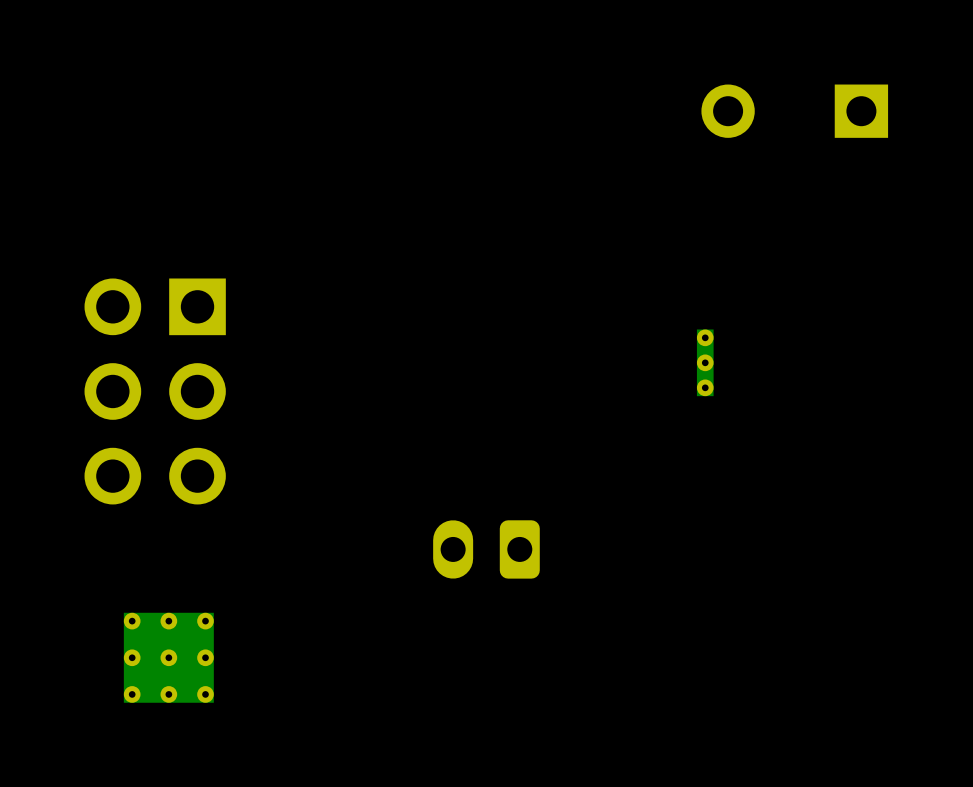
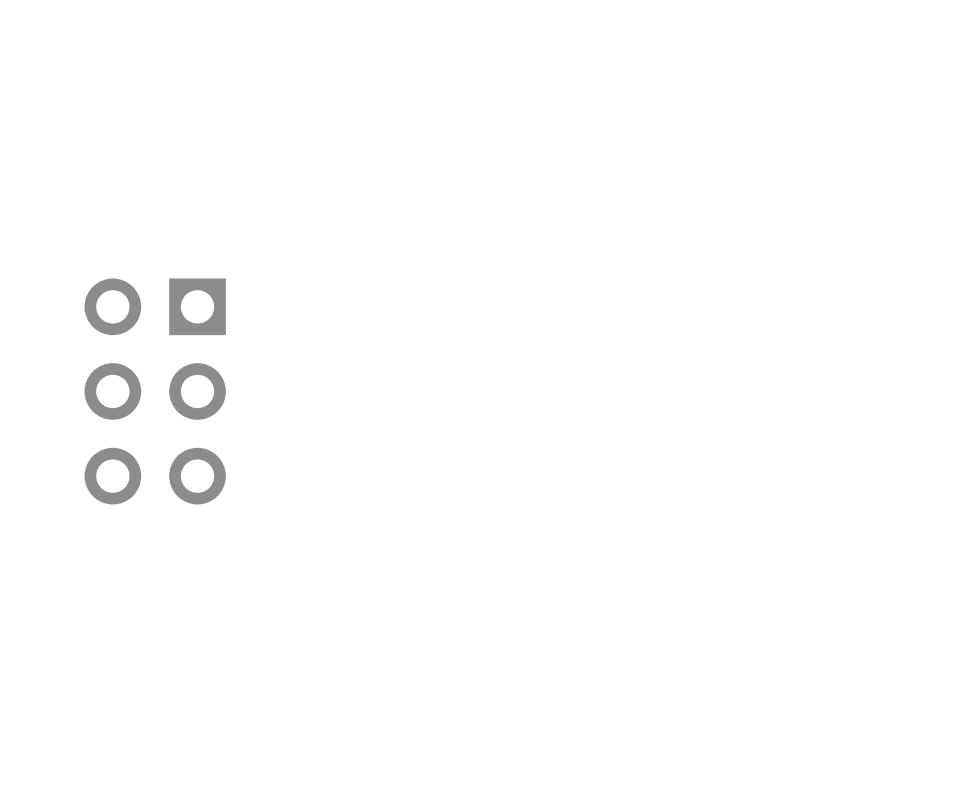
part: (794, 111) -> none
part: (705, 362) -> none
part: (486, 549) -> none
part: (168, 657) -> none

